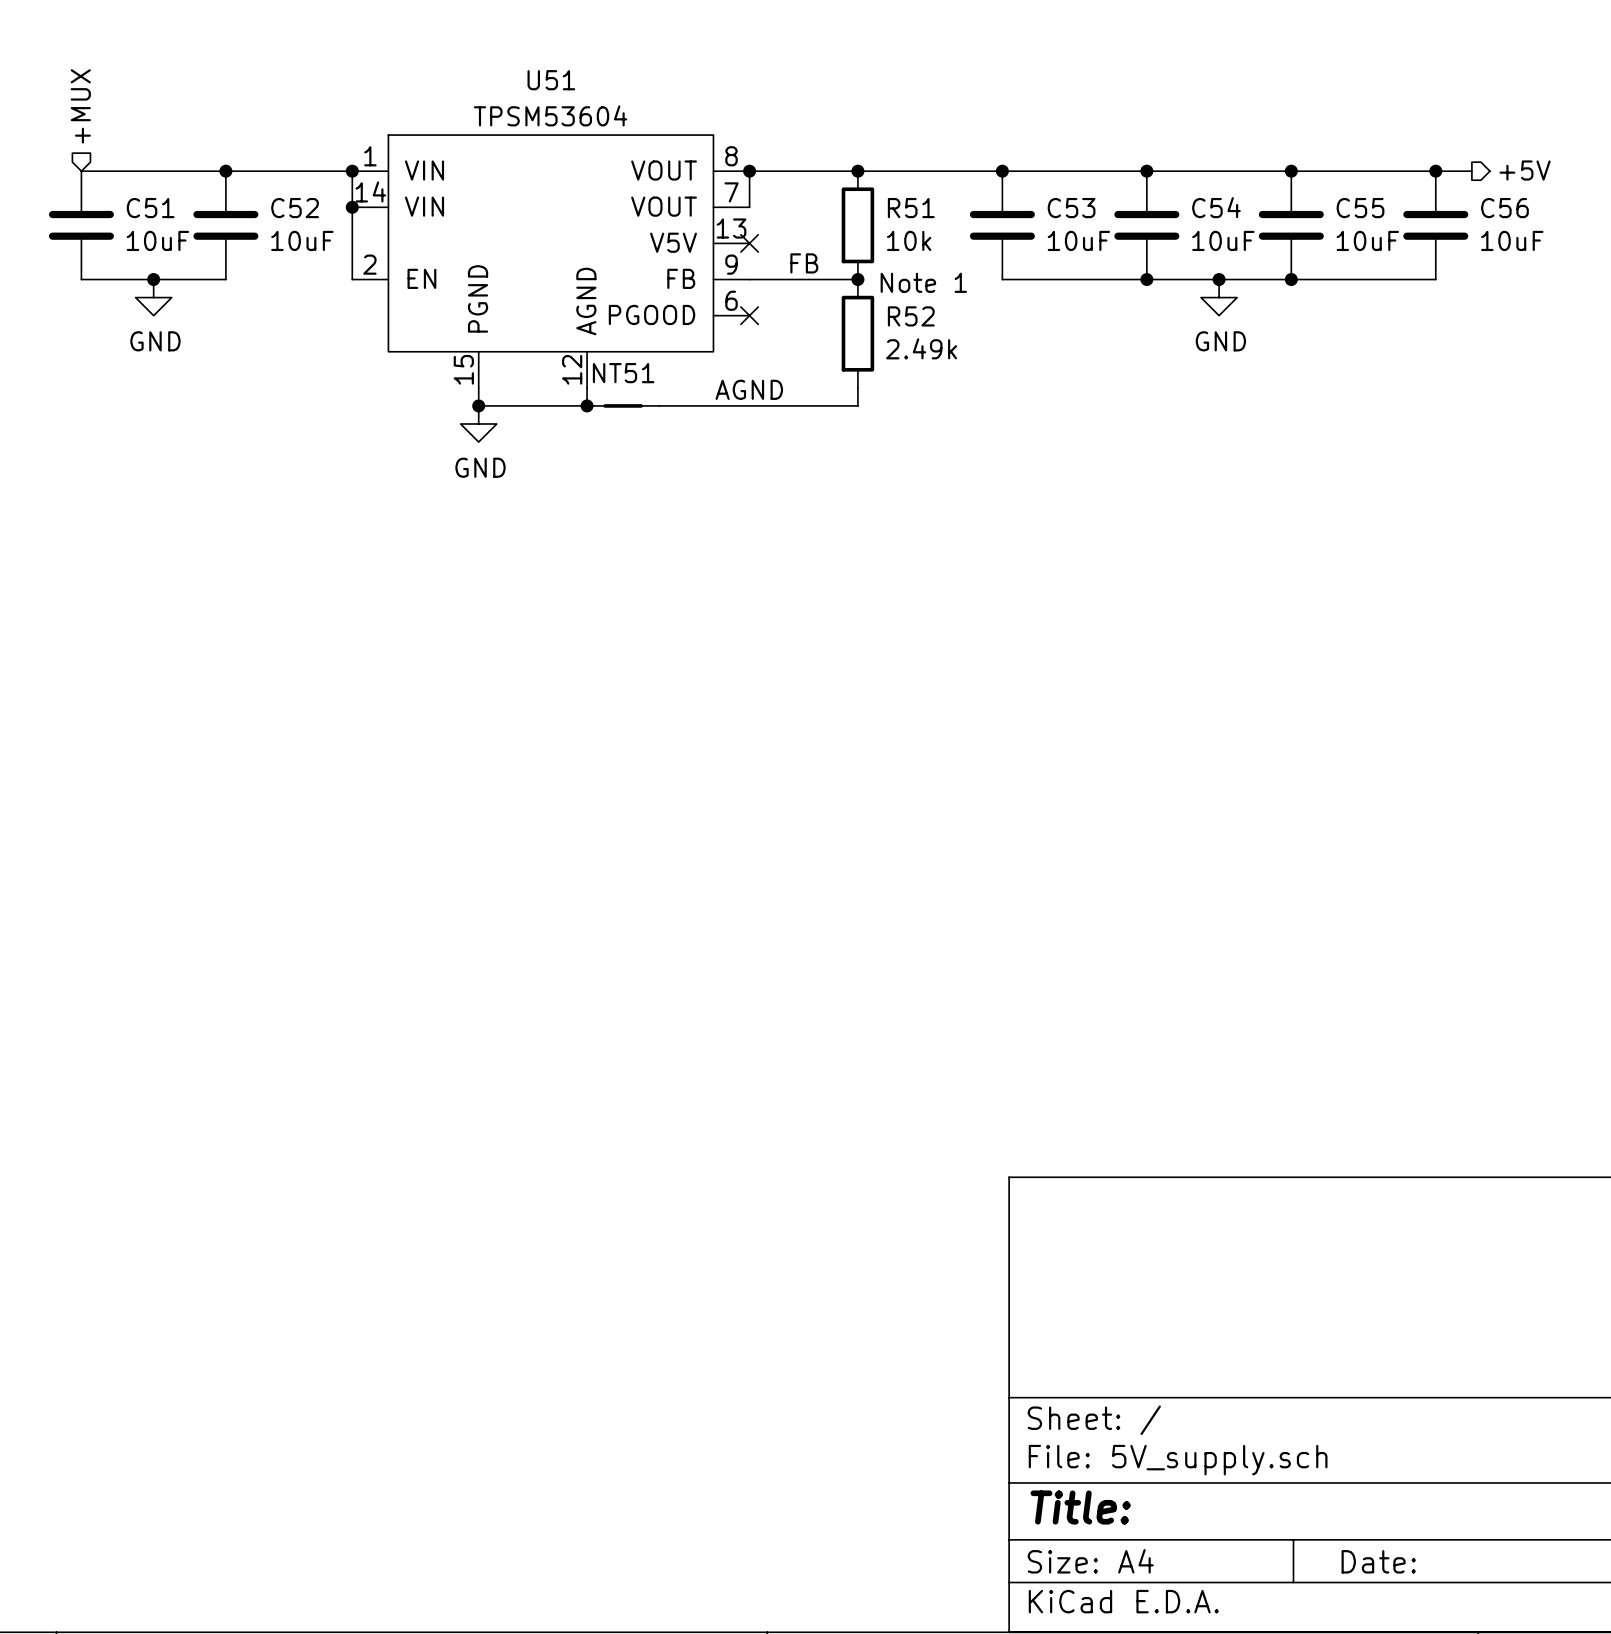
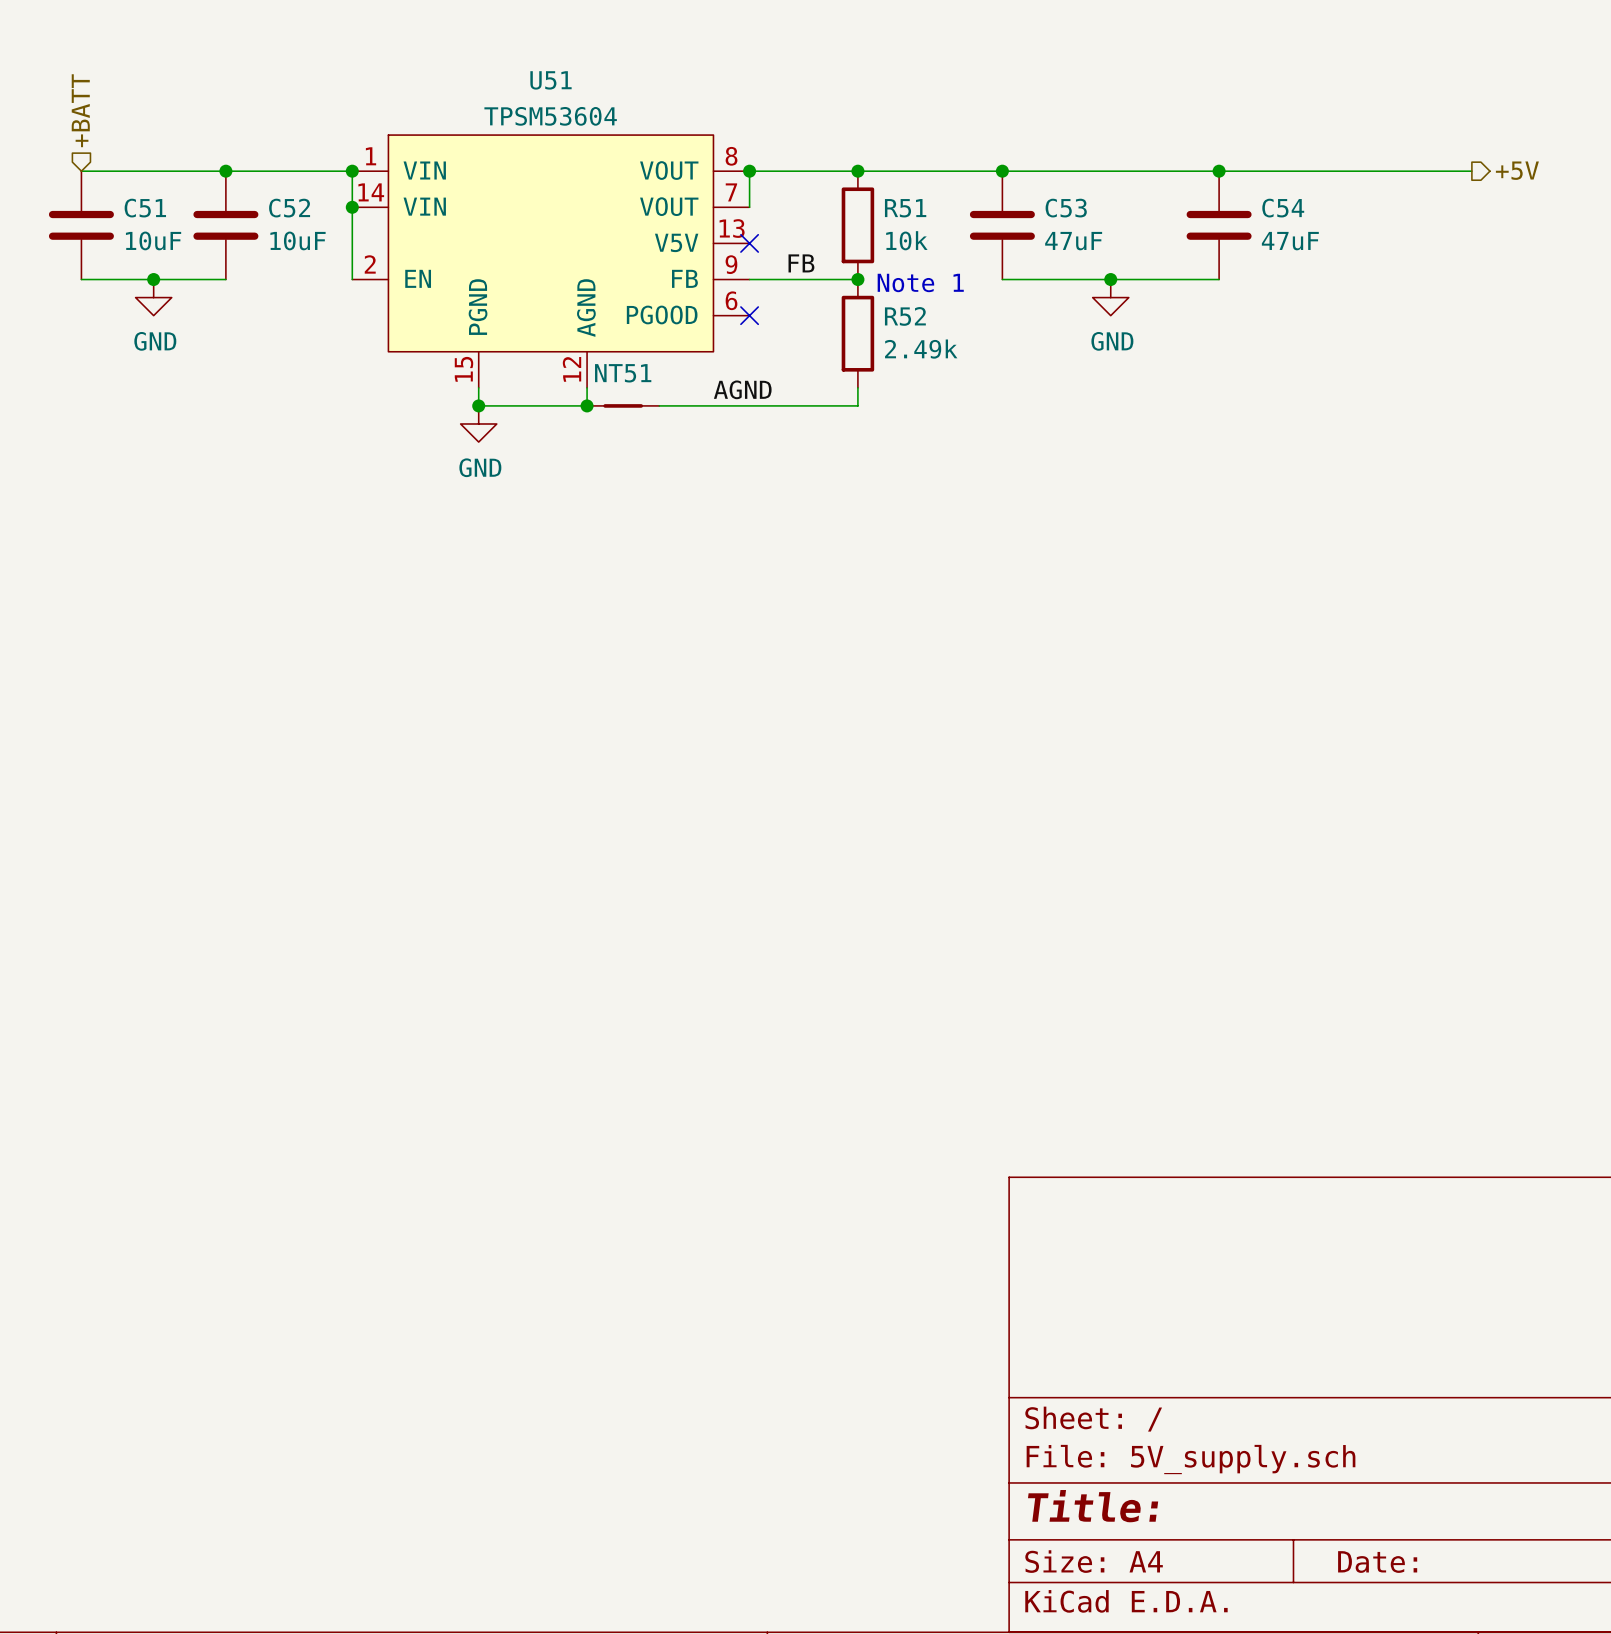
hierarchical label: +MUX (80, 106) -> +BATT (80, 110)
junction: (1146, 171) -> none
junction: none -> (1219, 171)
junction: (1291, 171) -> none
junction: (1435, 171) -> none
C54 position: (1146, 225) -> (1219, 225)
C55: 10uF (1291, 225) -> none
C56: 10uF (1435, 225) -> none
C53 value: 10uF (1078, 240) -> 47uF (1073, 241)
C54 value: 10uF (1223, 240) -> 47uF (1290, 241)
junction position: (1146, 279) -> (1110, 279)
wire: (1219, 279) (1435, 279) -> none
junction: (1219, 279) -> none
junction: (1291, 279) -> none
power symbol position: GND (1219, 297) -> GND (1110, 297)

